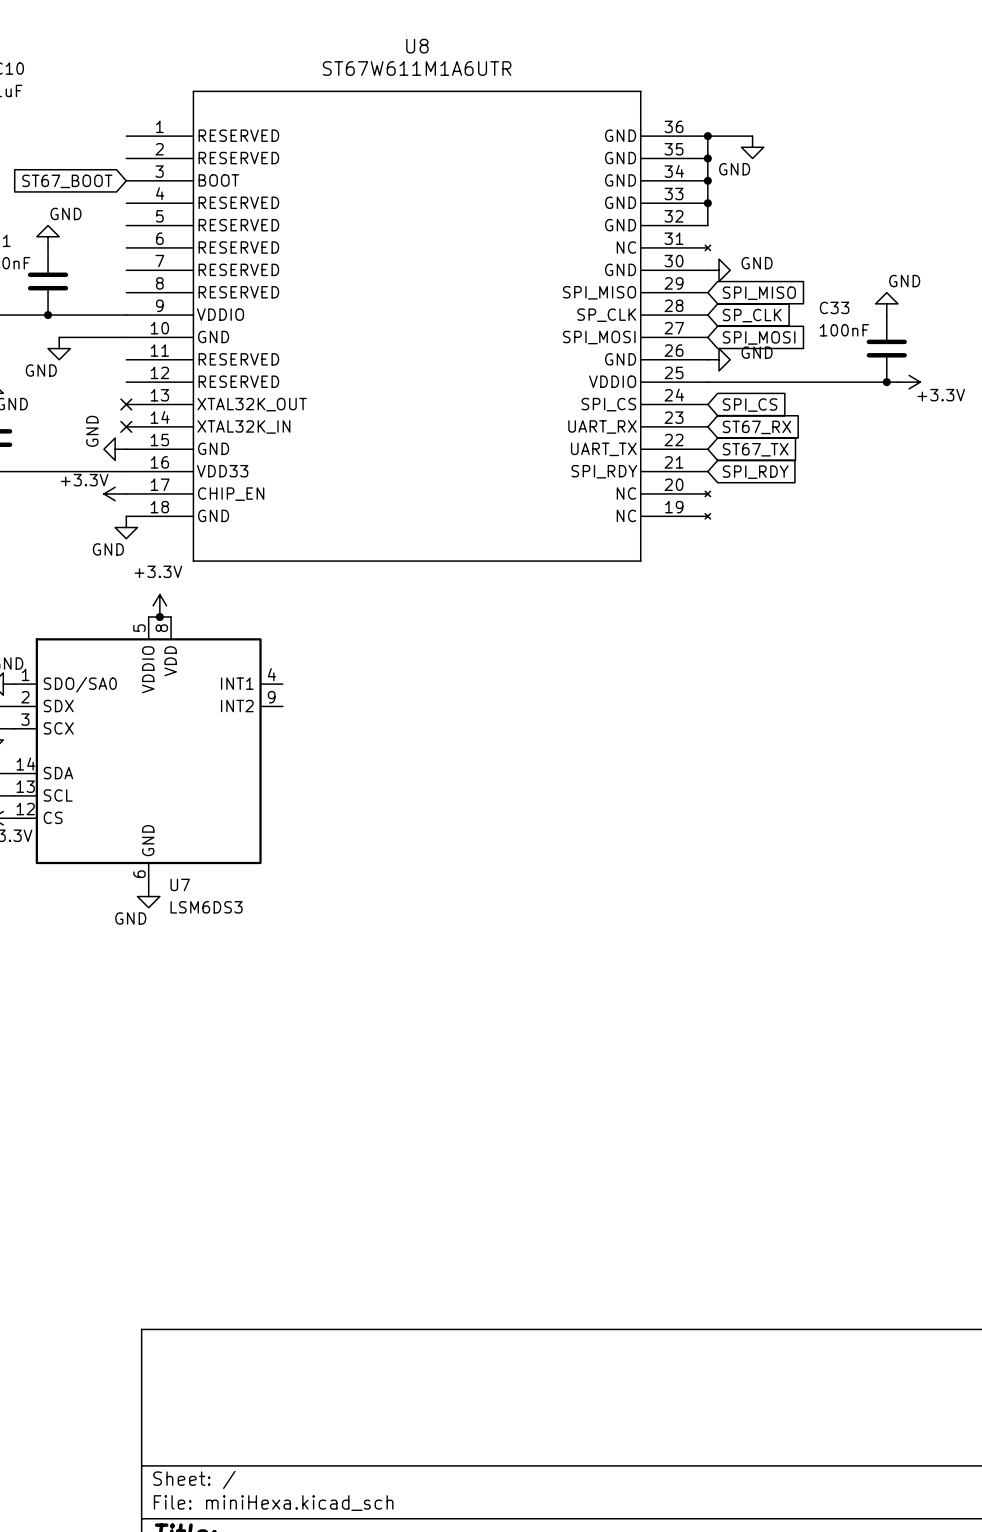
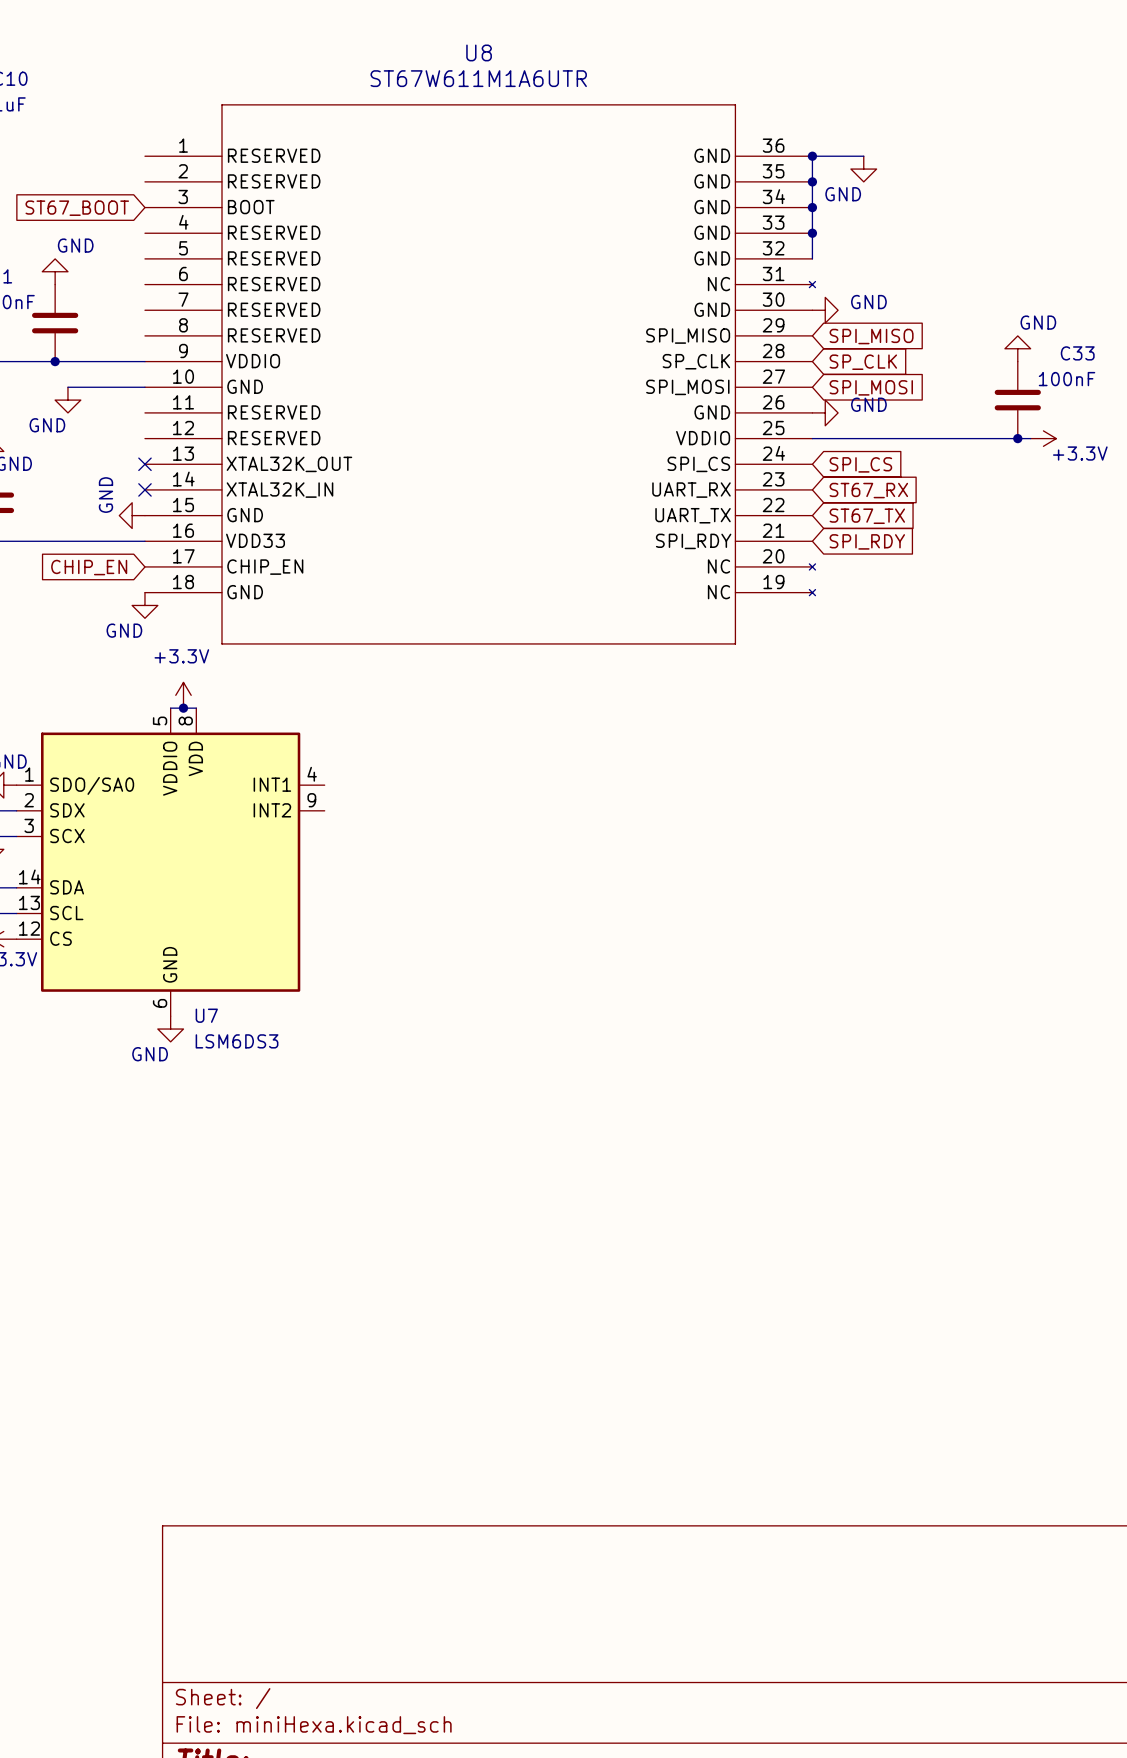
C33 name position: C33 (834, 307) -> C33 (1077, 353)
C33 value position: 100nF (844, 330) -> 100nF (1067, 379)
power symbol: +3.3V (115, 493) -> none
global label: none -> CHIP_EN (89, 567)

